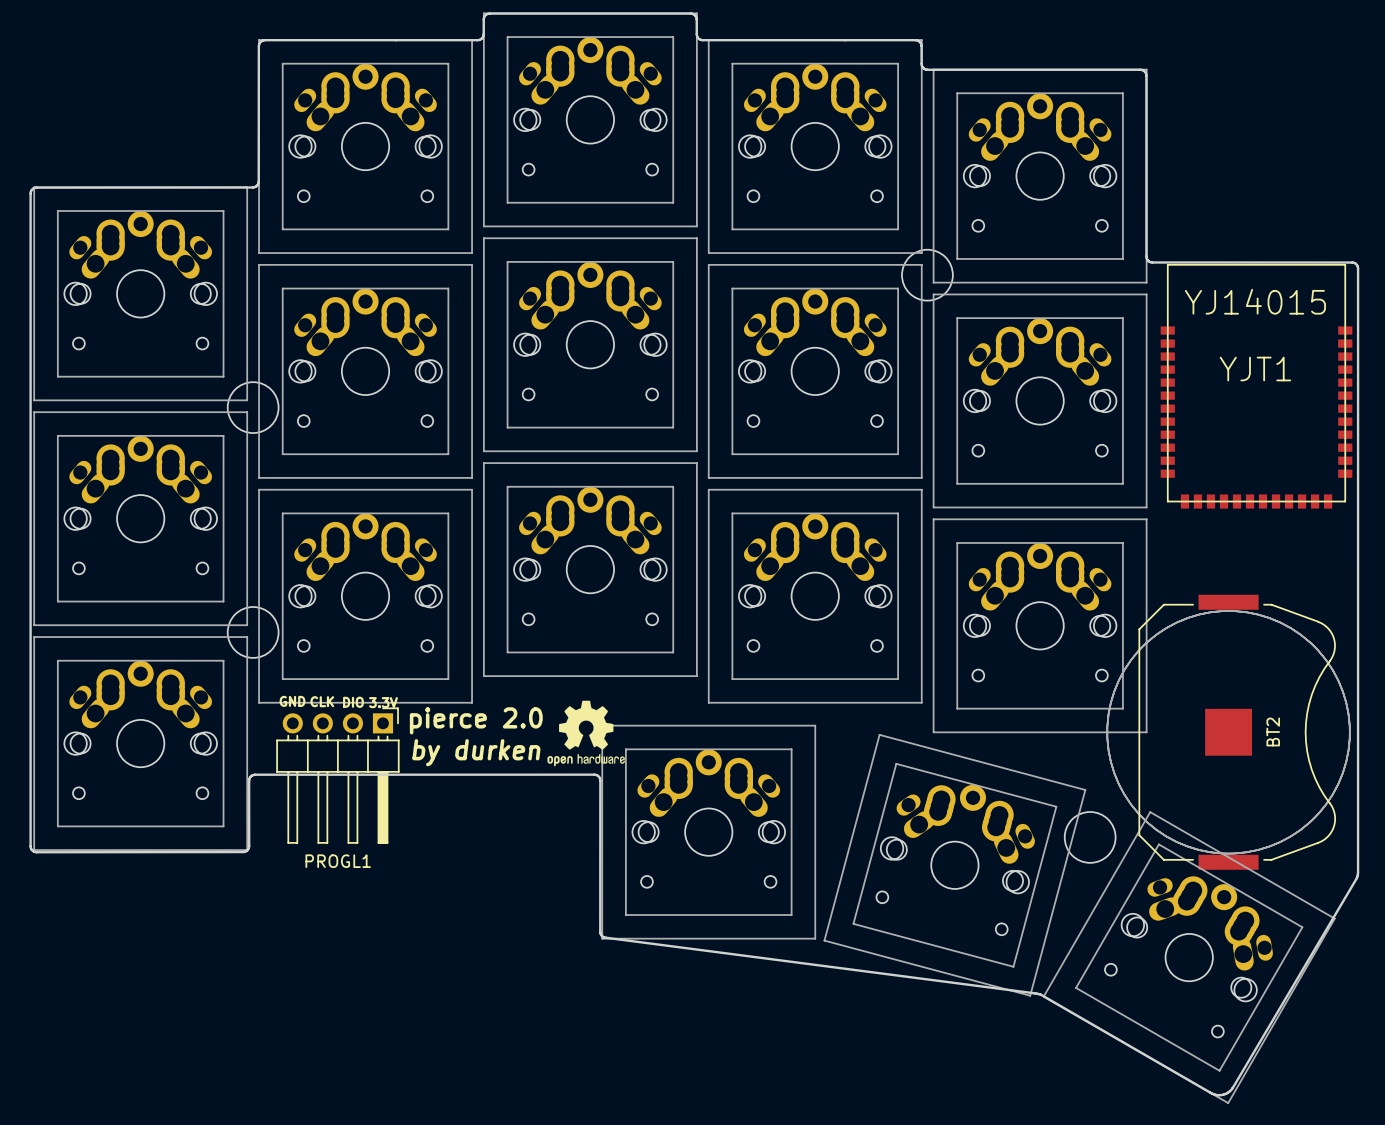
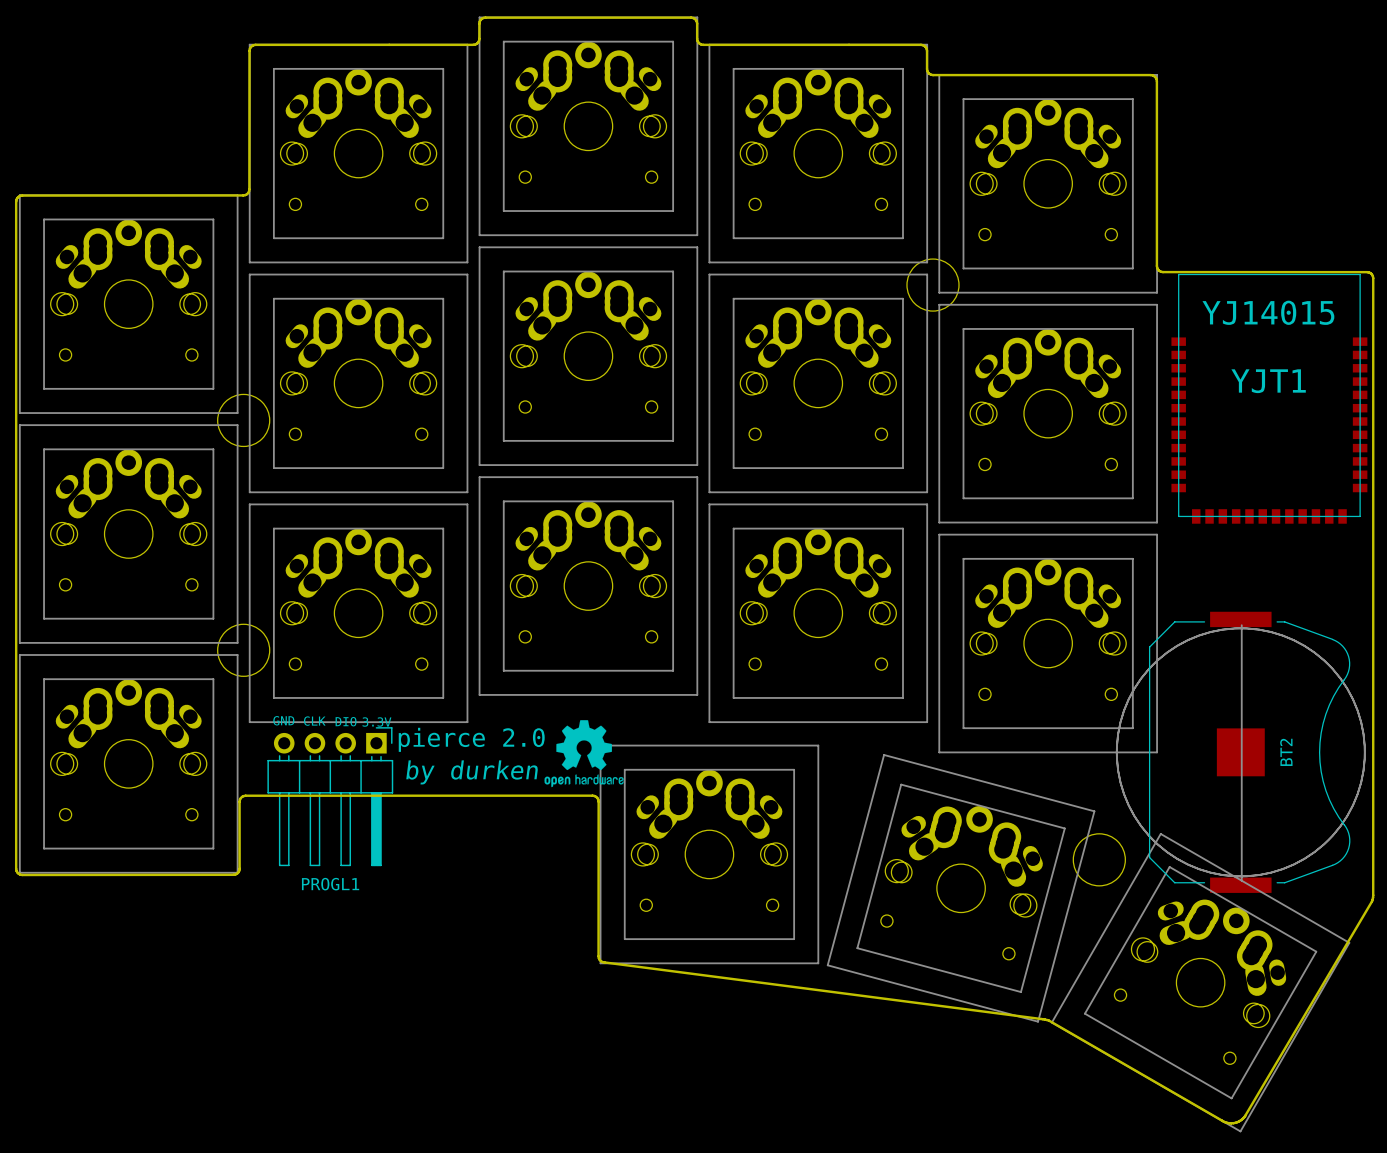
line: none -> (1241, 625) (1241, 880)

